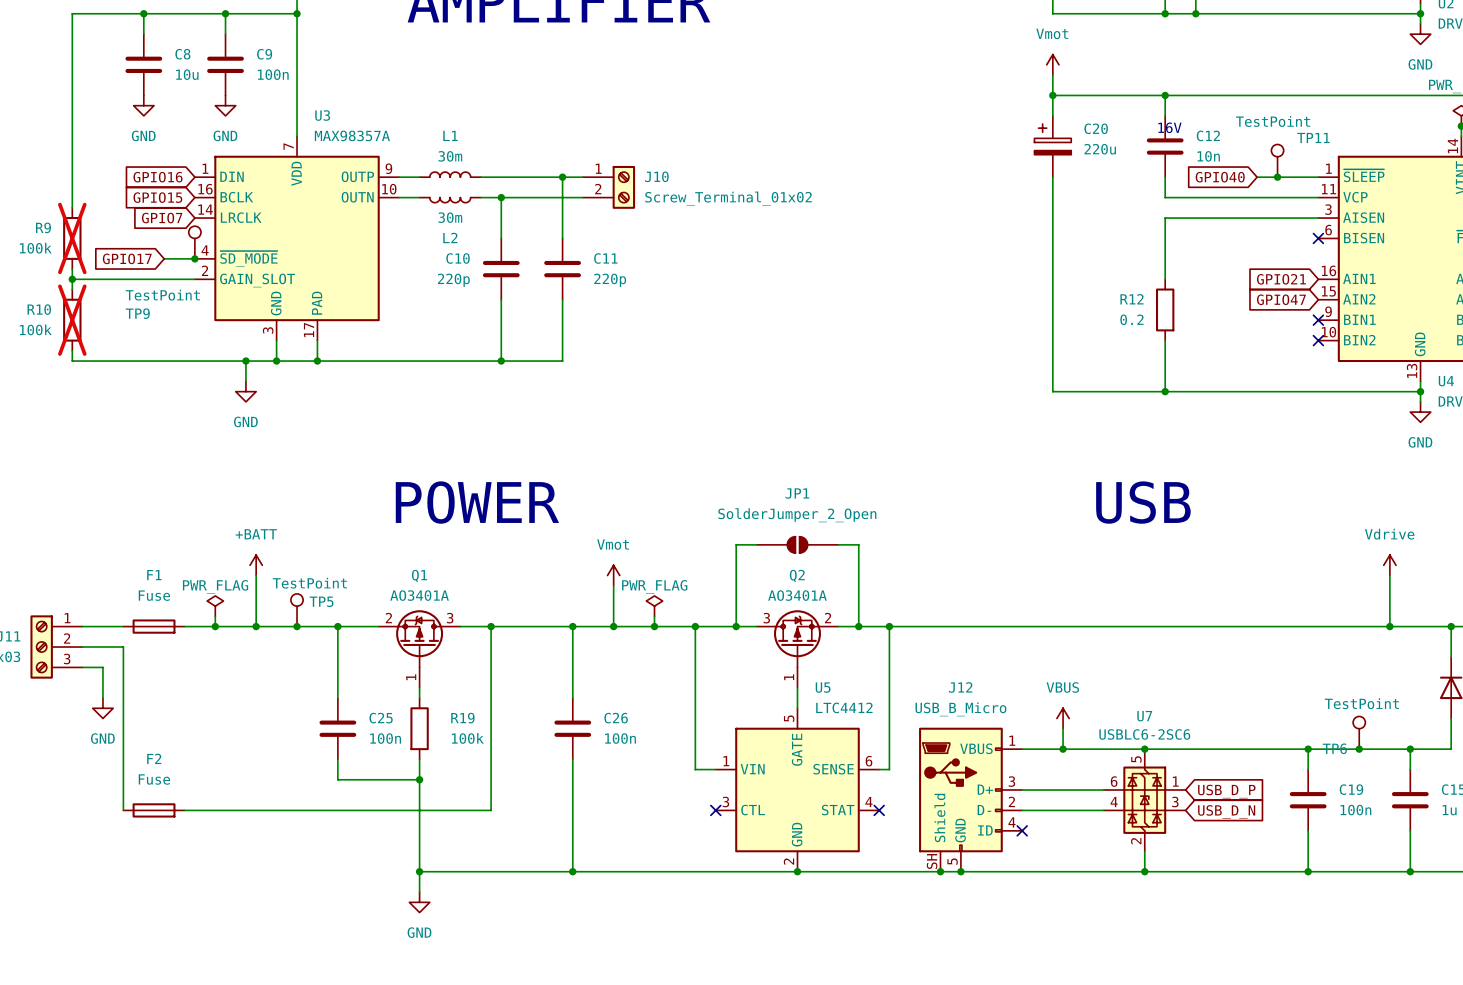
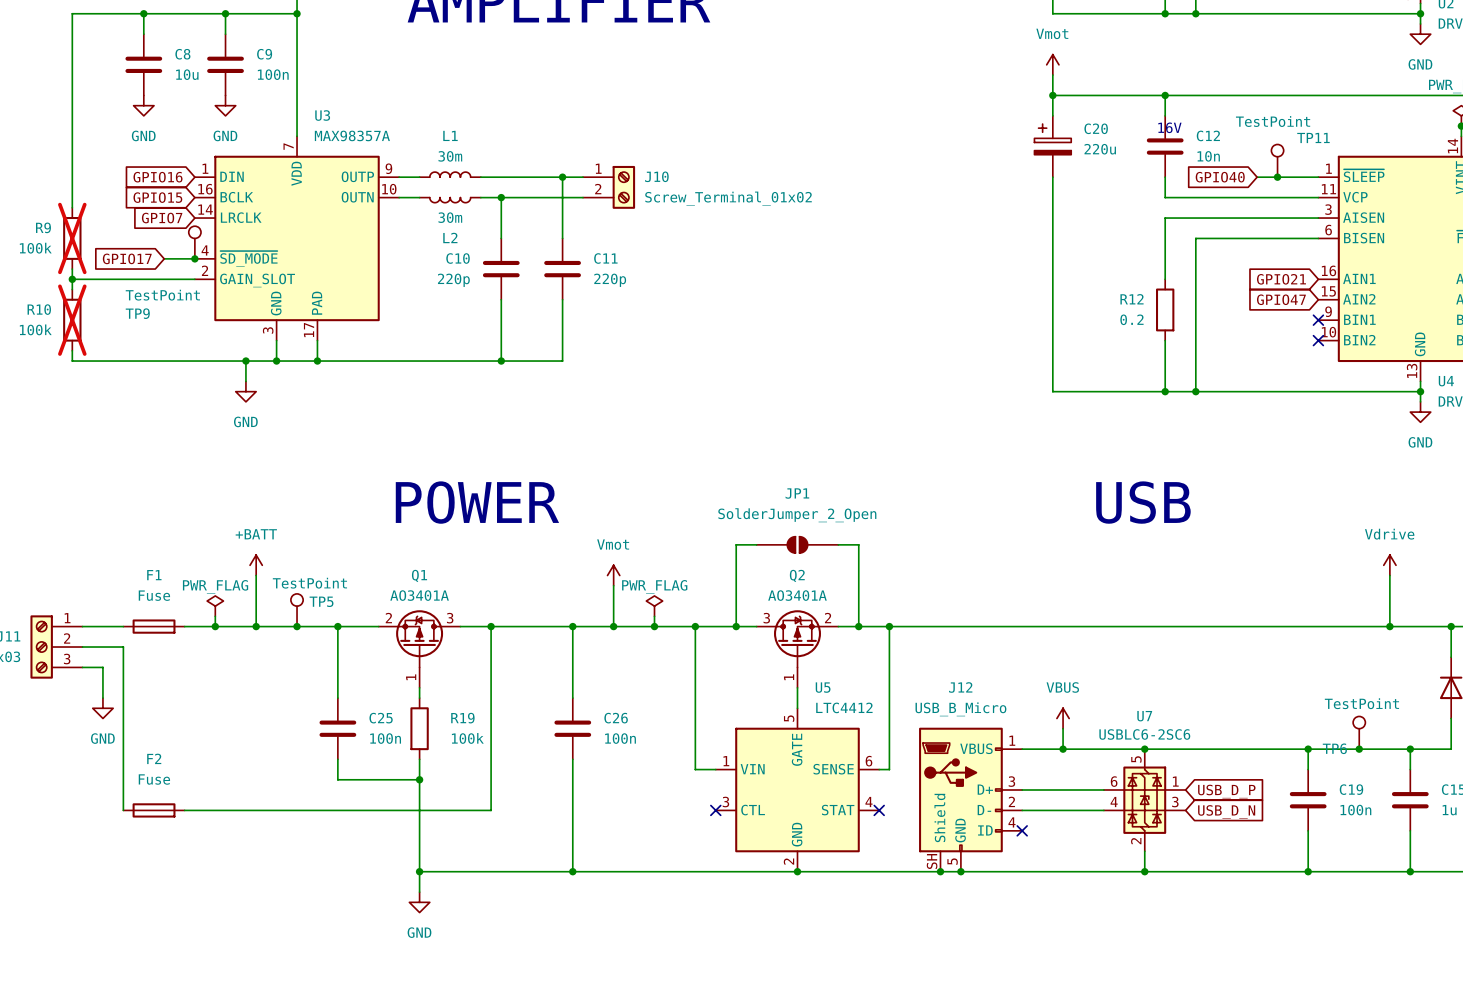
wire: none -> (1318, 238) (1195, 238) (1195, 391)
no-connect mark: (1318, 238) -> none
junction: none -> (1195, 391)

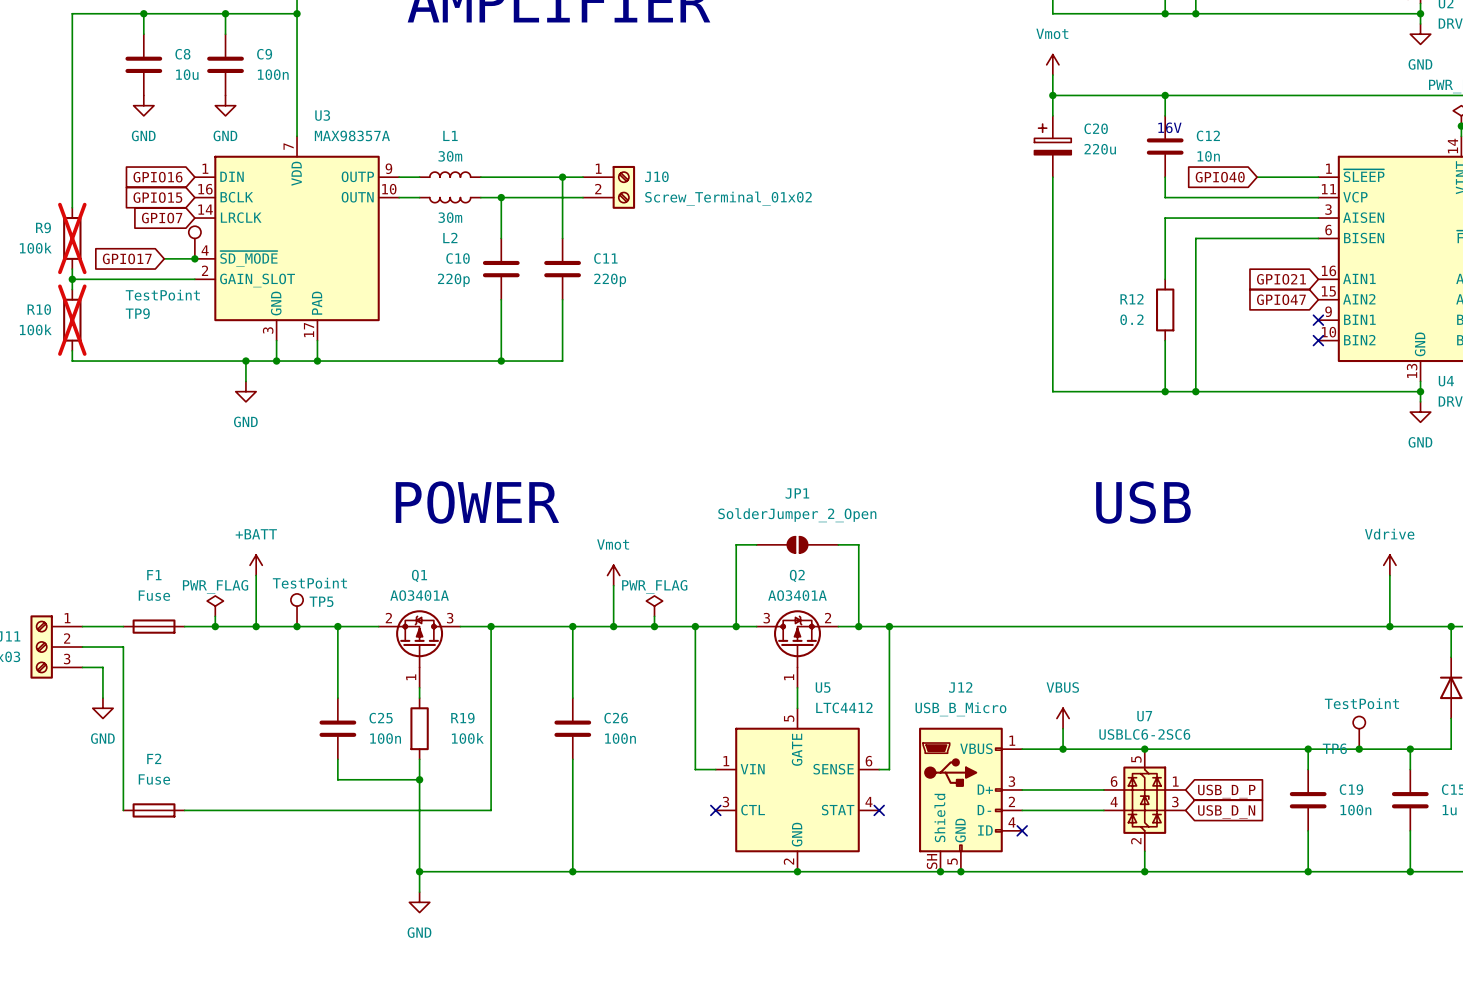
TP11: TestPoint (1277, 160) -> none
junction: (1277, 177) -> none

